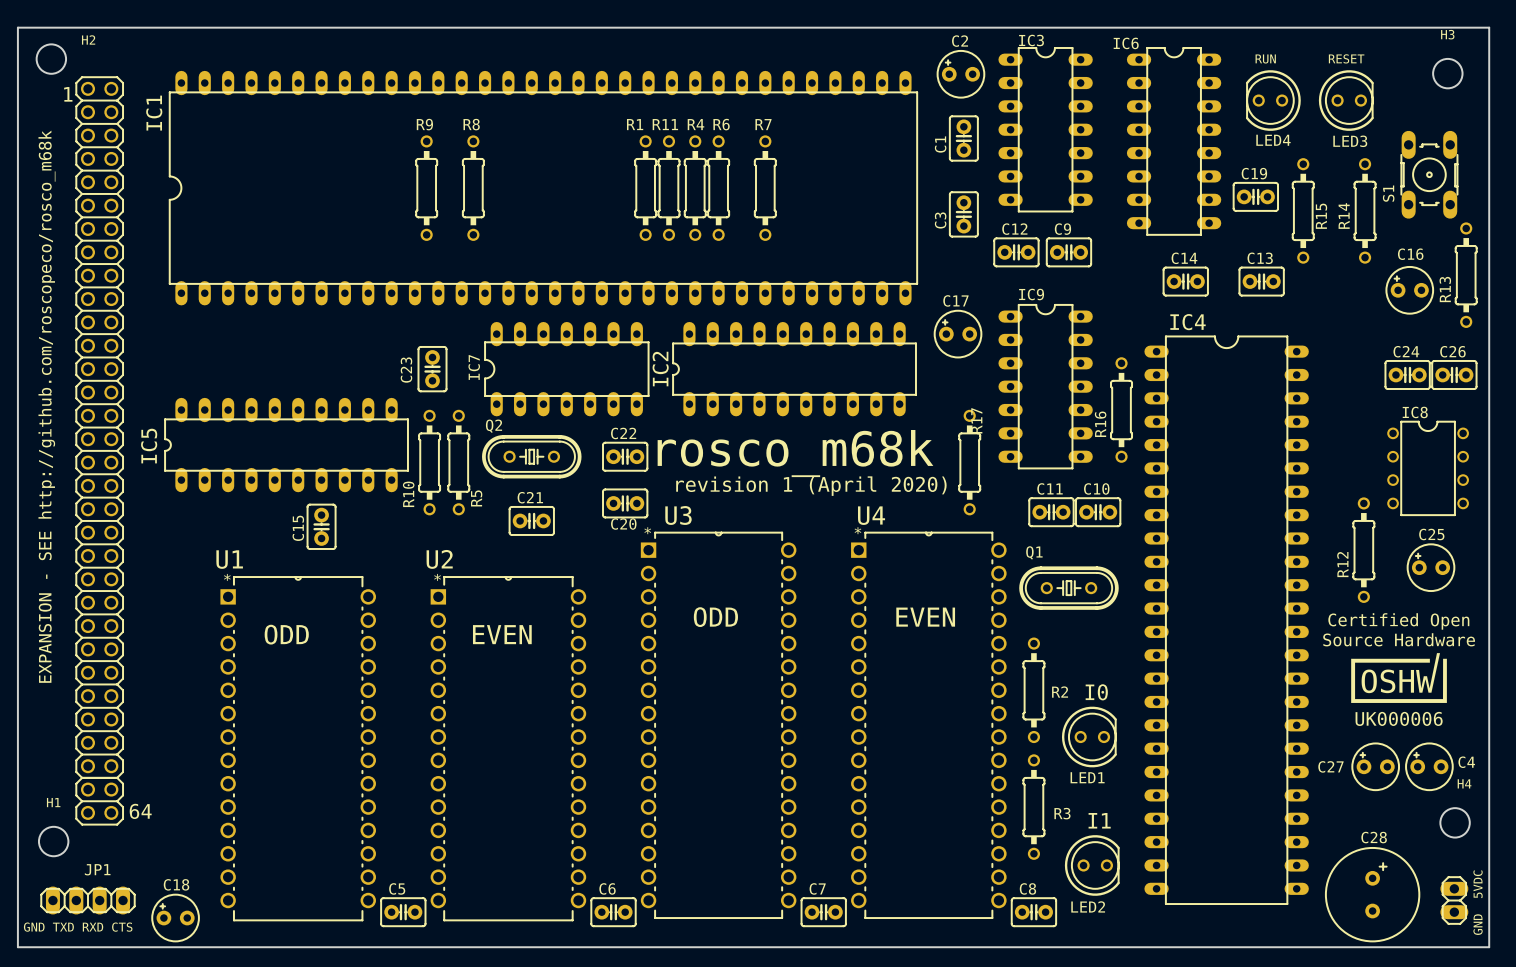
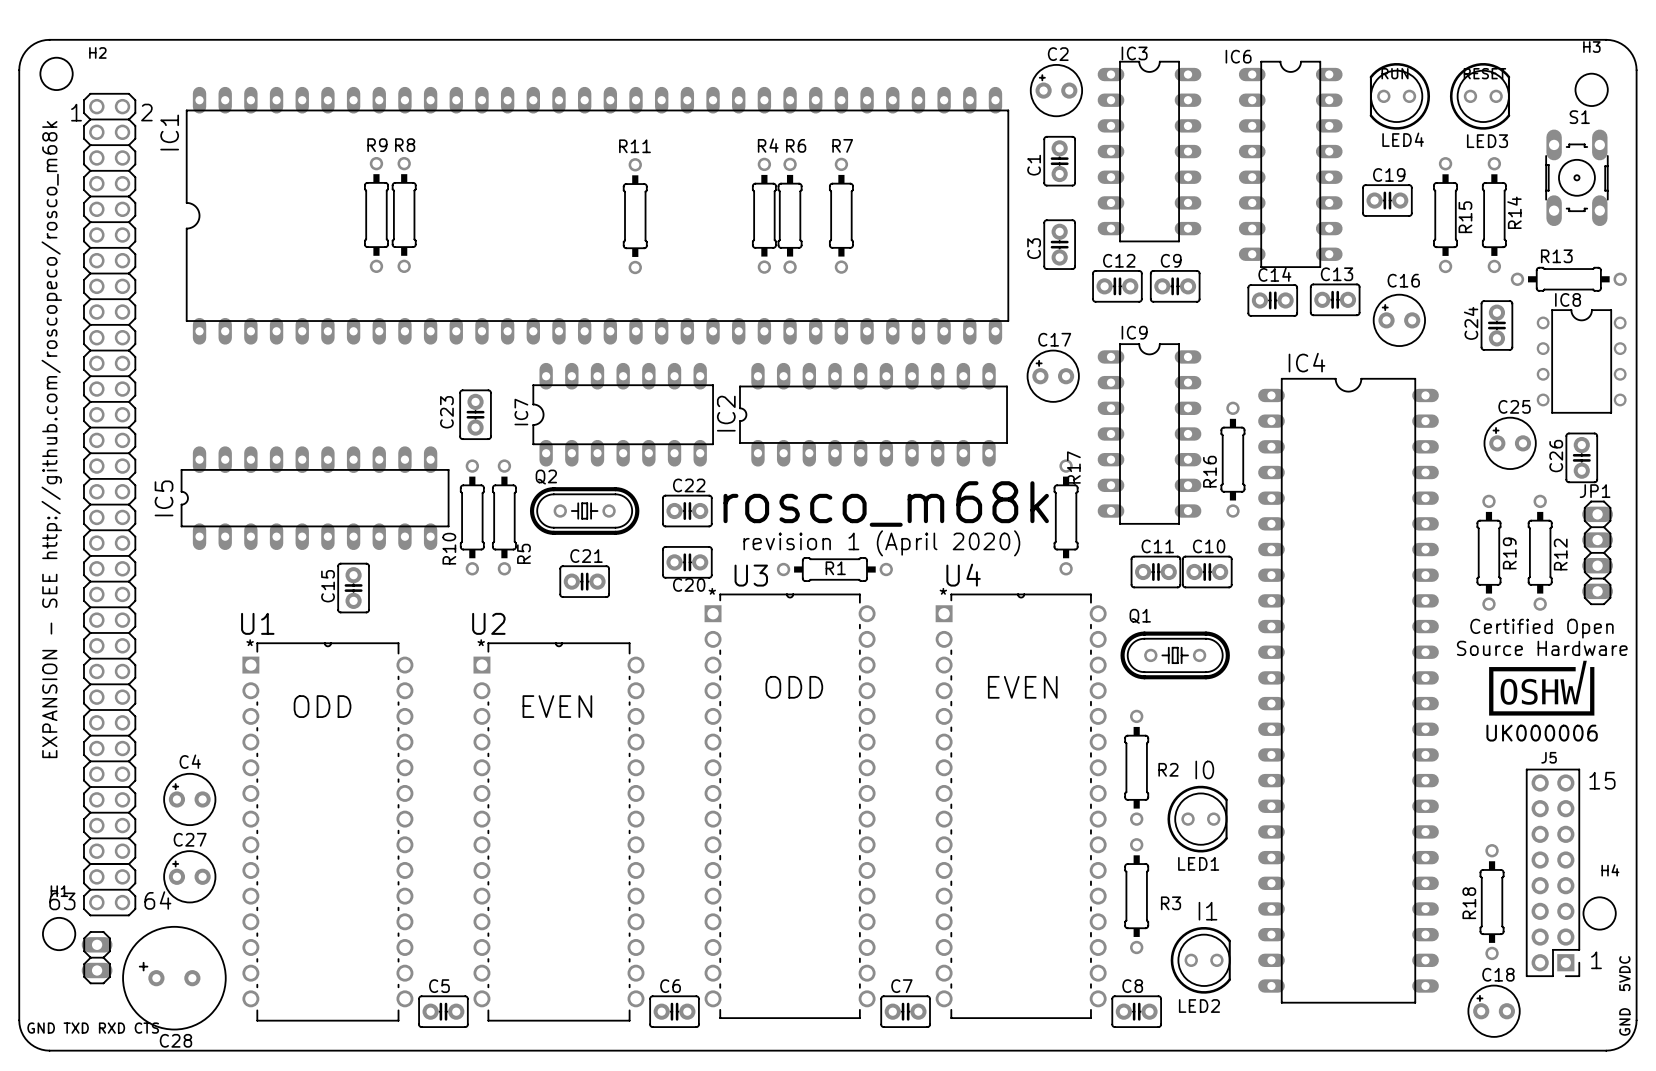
board edge: (17, 27) (1489, 27) (1489, 947) (17, 947) (17, 27) -> (49, 39) (37, 42) (28, 48) (21, 58) (19, 70) (19, 1020) (23, 1035) (34, 1046) (49, 1050) (1606, 1050) (1621, 1046) (1632, 1035) (1636, 1020) (1636, 70) (1632, 54) (1621, 43) (1606, 39) (49, 39)
text: none -> 2 (146, 112)
LED4 position: (1273, 100) -> (1399, 96)
LED3 position: (1346, 100) -> (1480, 96)
R1 name position: R1 (635, 124) -> R1 (835, 568)
S1 position: (1429, 174) -> (1576, 177)
R9 position: (426, 188) -> (376, 214)
R8 position: (473, 188) -> (404, 214)
R1 rotation: 0° (645, 188) -> 90° clockwise (834, 569)
R1 position: (645, 188) -> (834, 569)
R11 position: (668, 188) -> (635, 216)
S1 name rotation: 0° (1388, 193) -> 90° clockwise (1579, 117)
S1 name position: S1 (1388, 193) -> S1 (1579, 117)
C19 position: (1255, 196) -> (1387, 200)
R15 position: (1303, 210) -> (1445, 215)
R14 position: (1365, 210) -> (1494, 215)
R14 name position: R14 (1344, 216) -> R14 (1514, 212)
R13 rotation: 0° (1466, 275) -> 90° clockwise (1568, 279)
C14 position: (1185, 281) -> (1272, 300)
C13 position: (1261, 281) -> (1335, 299)
C16 position: (1409, 290) -> (1399, 320)
C24 name position: C24 (1406, 351) -> C24 (1471, 323)
C26 name position: C26 (1452, 351) -> C26 (1556, 456)
C24 rotation: 0° (1407, 374) -> 90° clockwise (1496, 325)
C24 position: (1407, 374) -> (1496, 325)
C26 rotation: 0° (1454, 374) -> 90° clockwise (1581, 457)
C26 position: (1454, 374) -> (1581, 457)
IC8 position: (1428, 468) -> (1581, 361)
R19: none -> (1488, 552)
R12 position: (1363, 550) -> (1540, 552)
R12 name position: R12 (1342, 564) -> R12 (1560, 554)
C25 position: (1431, 567) -> (1510, 443)
text position: Certified Open (1398, 621) -> Certified Open (1541, 628)
text position: Source Hardware (1399, 639) -> Source Hardware (1542, 648)
drawing position: (1399, 678) -> (1541, 688)
text: none -> 15 (1602, 780)
C4 name position: C4 (1466, 762) -> C4 (190, 761)
C27 name position: C27 (1330, 766) -> C27 (190, 839)
C27 position: (1375, 766) -> (189, 876)
C4 position: (1429, 766) -> (189, 799)
J5: none -> (1552, 872)
text: none -> 63 (62, 901)
R18: none -> (1492, 902)
C28 name position: C28 (1374, 837) -> C28 (175, 1040)
part: none -> (97, 957)
text: none -> 1 (1596, 960)
JP1 name position: JP1 (97, 869) -> JP1 (1595, 491)
C28 rotation: 0° (1372, 894) -> 90° counterclockwise (174, 978)
C28 position: (1372, 894) -> (174, 978)
JP1 rotation: 0° (87, 900) -> 90° clockwise (1597, 552)
JP1 position: (87, 900) -> (1597, 552)
part: (1454, 900) -> none
C18 position: (175, 918) -> (1494, 1011)

